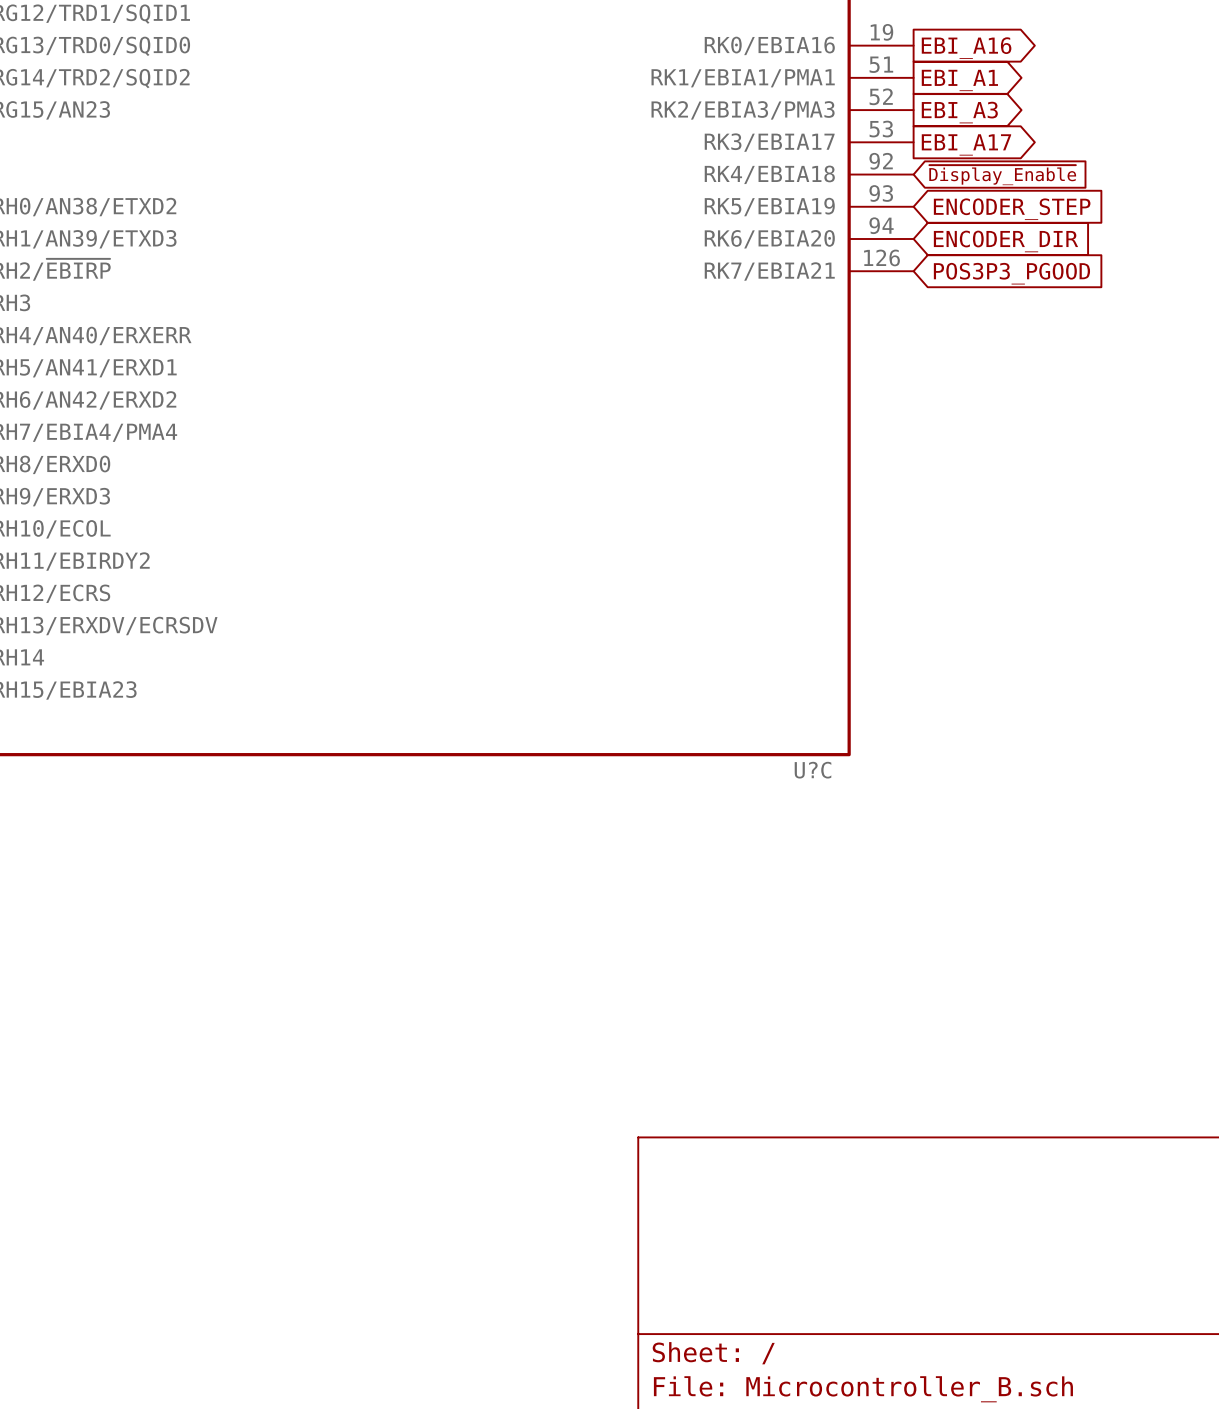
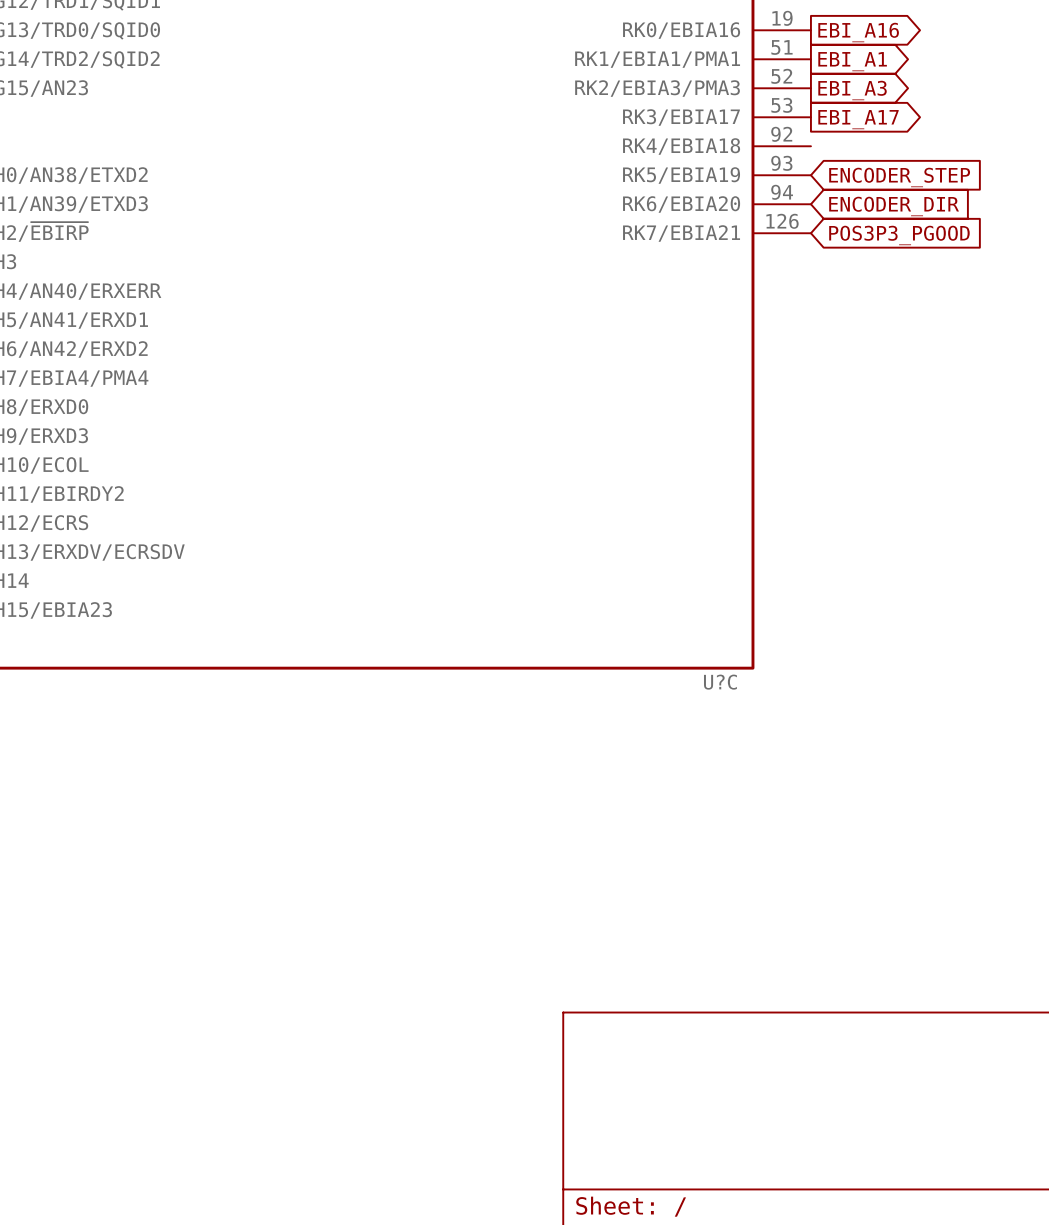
global label: ~{Display_Enable} (1002, 175) -> none

